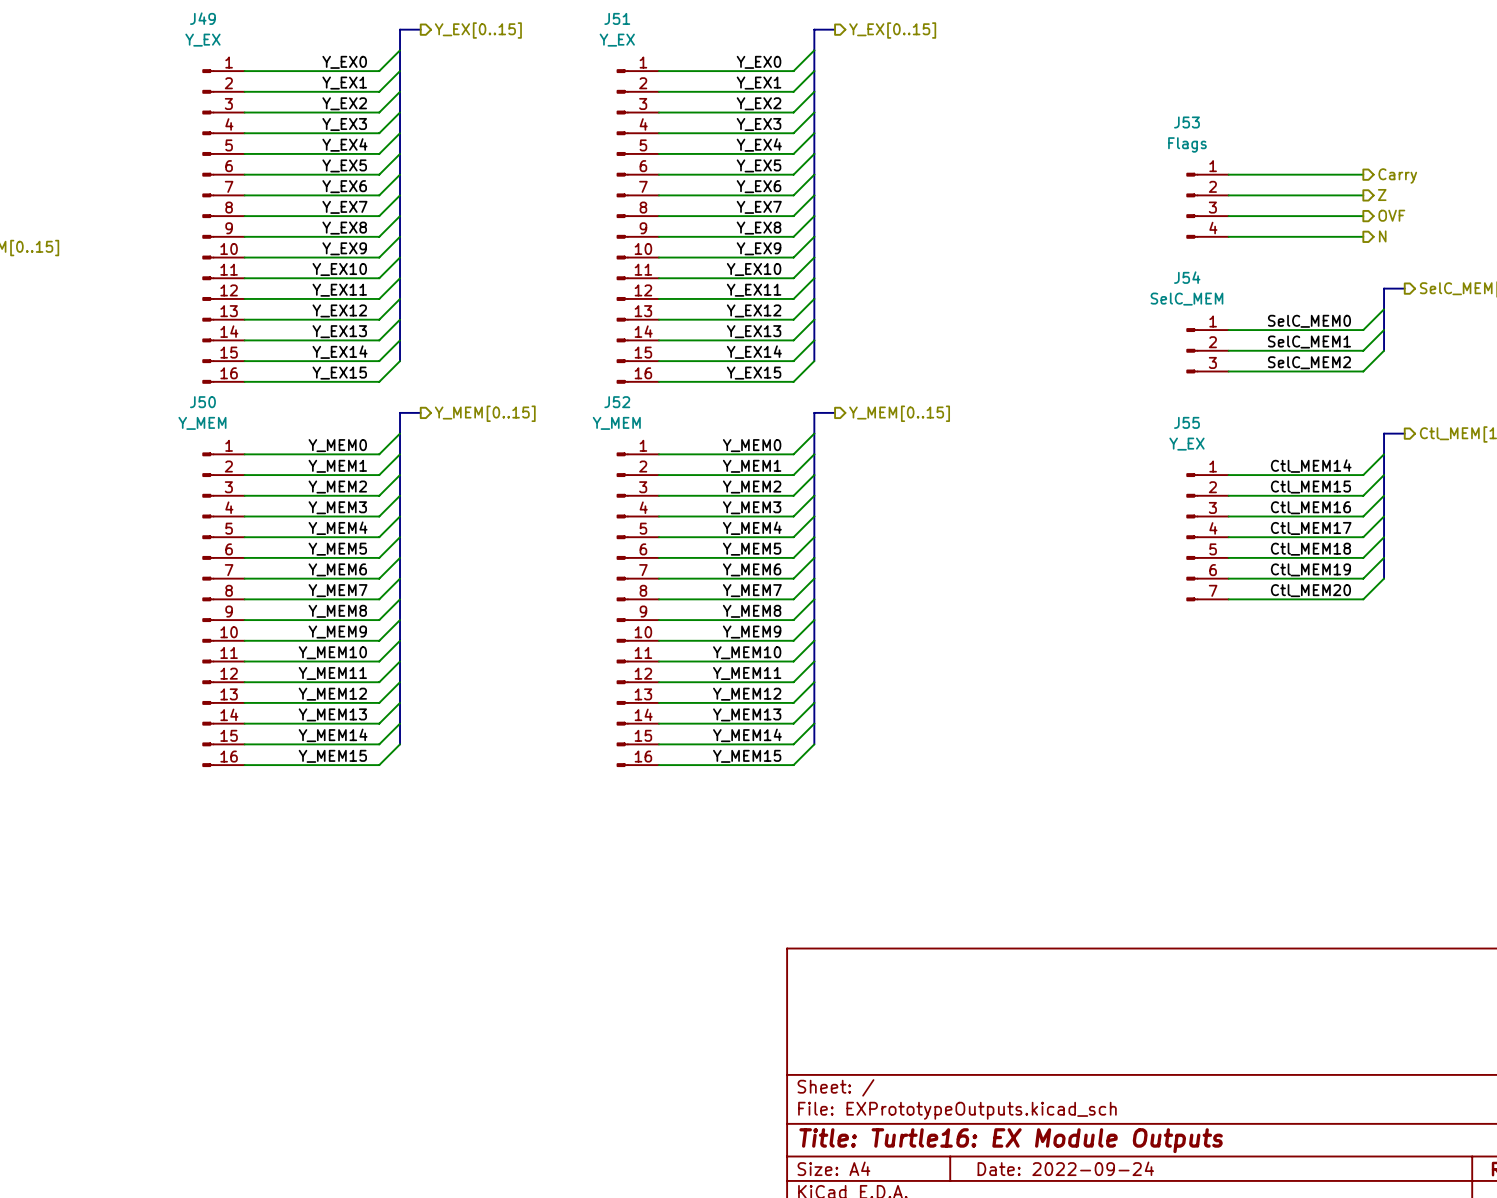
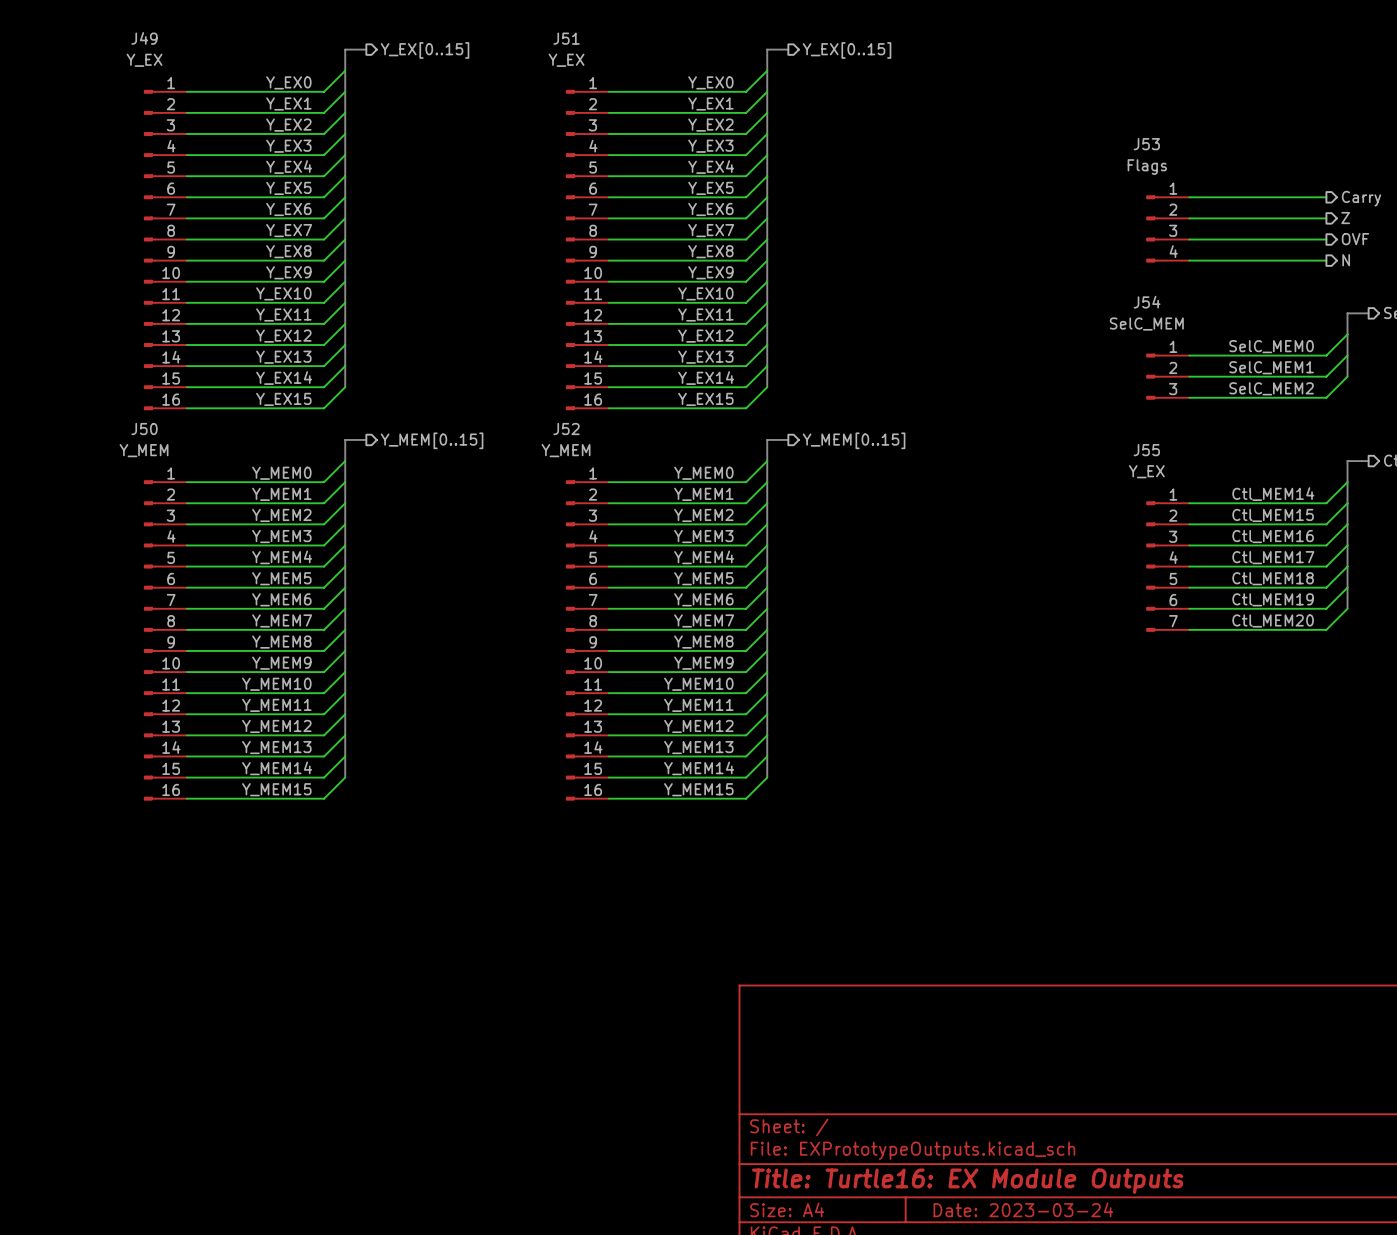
title block: Date: 2022-09-24 (1065, 1168) -> Date: 2023-03-24 (1023, 1209)

